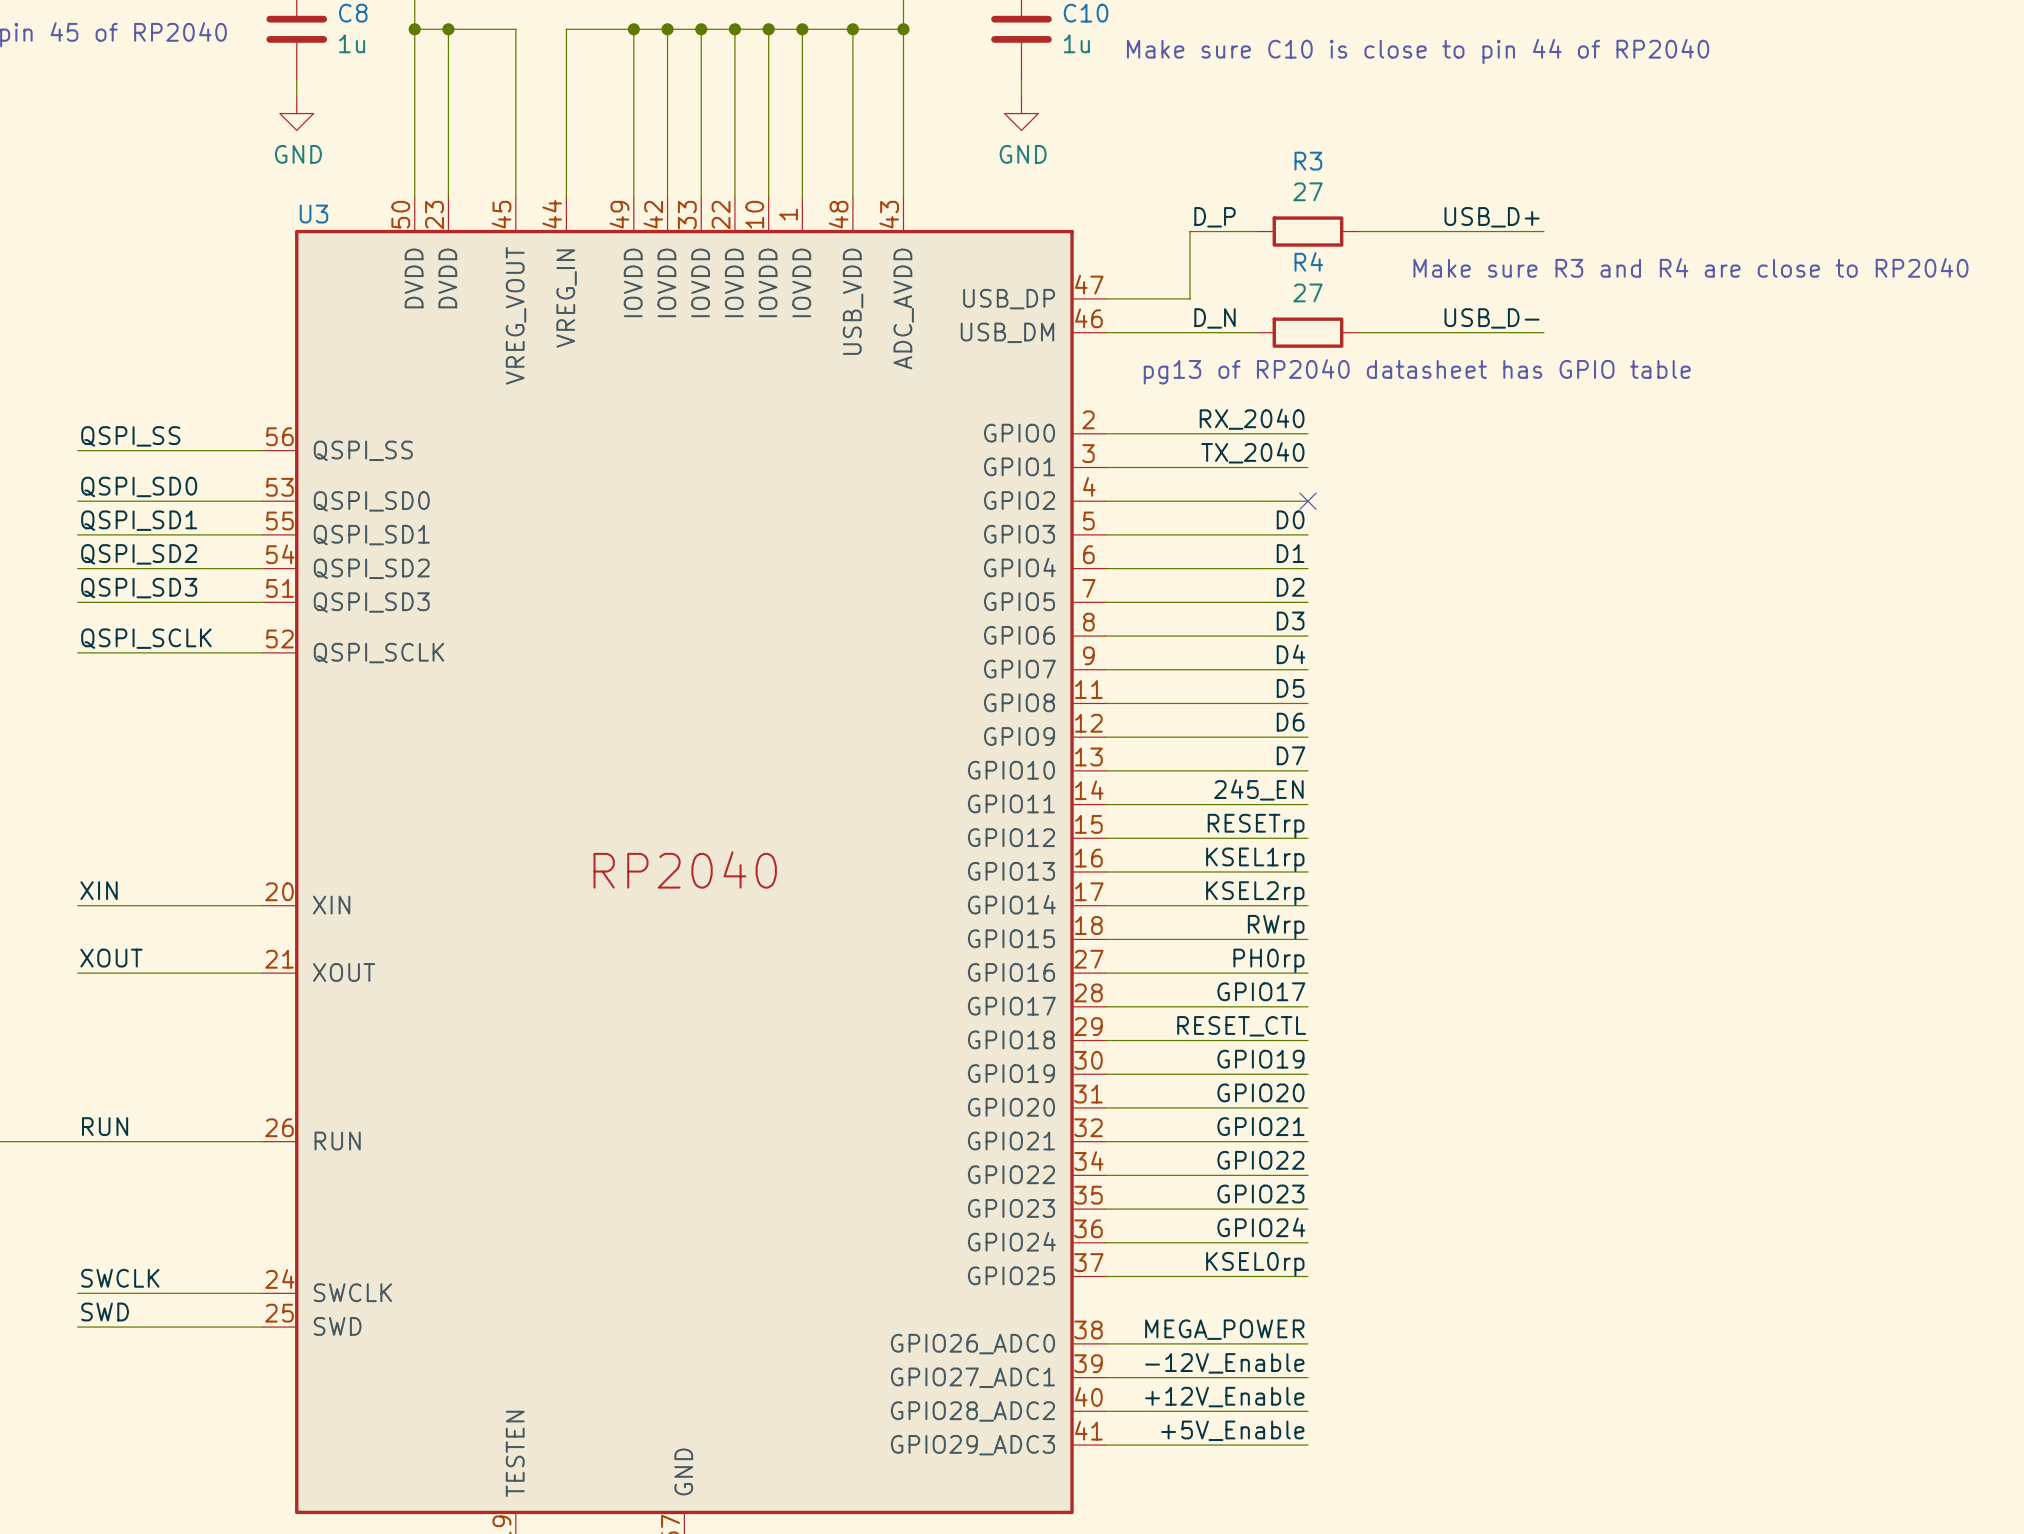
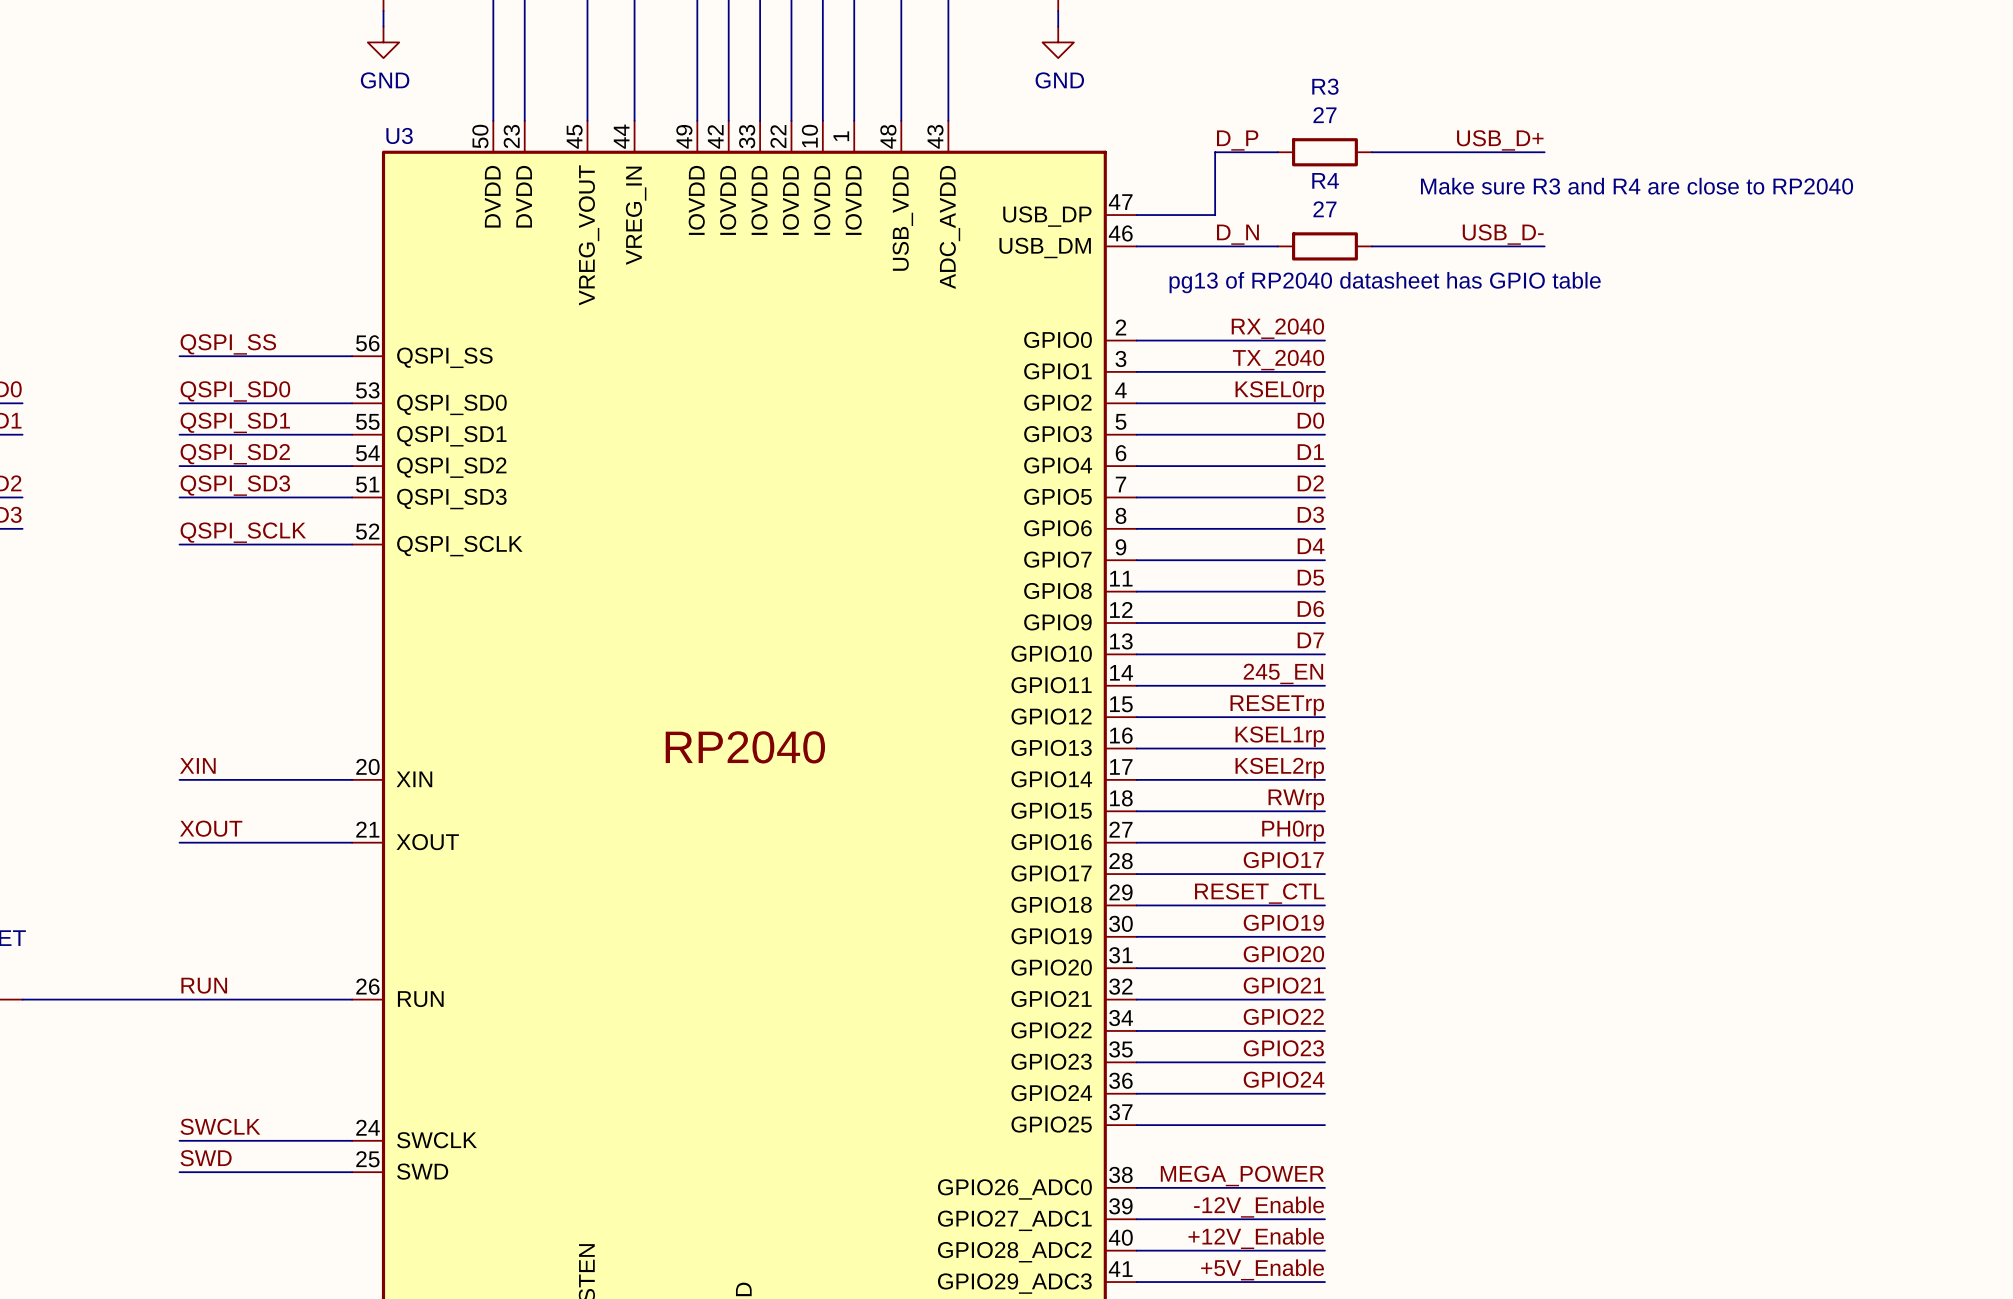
label: none -> KSEL0rp (1279, 391)
no-connect mark: (1307, 501) -> none
label: KSEL0rp (1255, 1264) -> none

